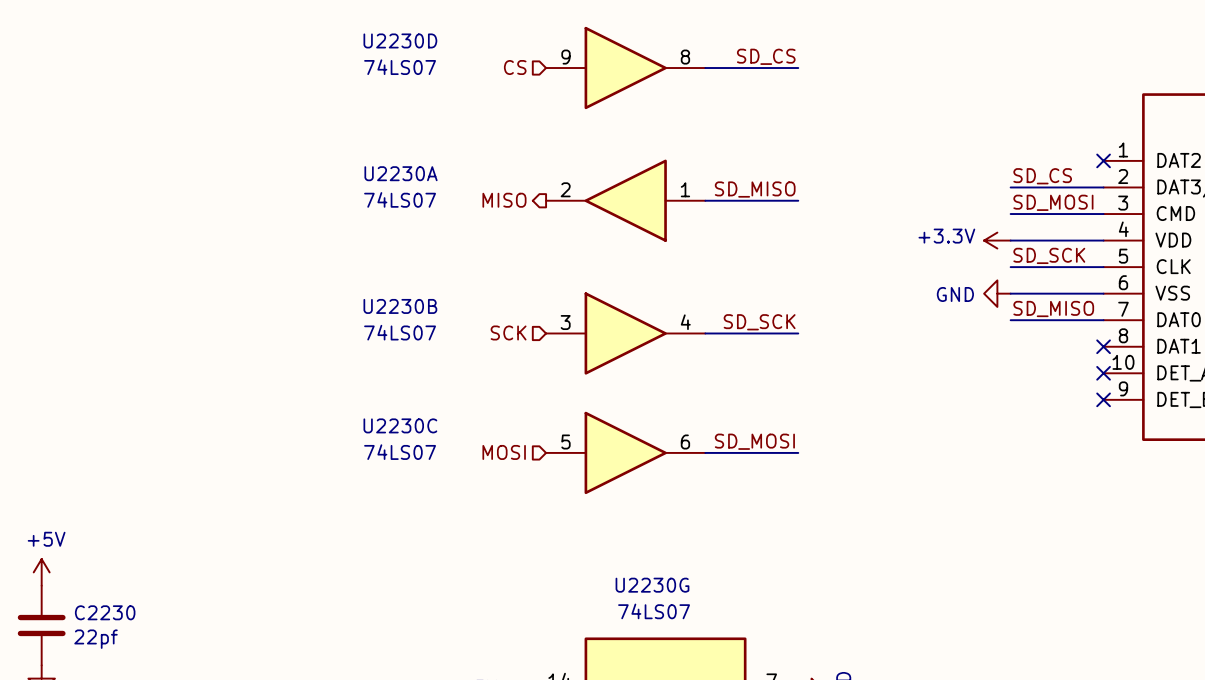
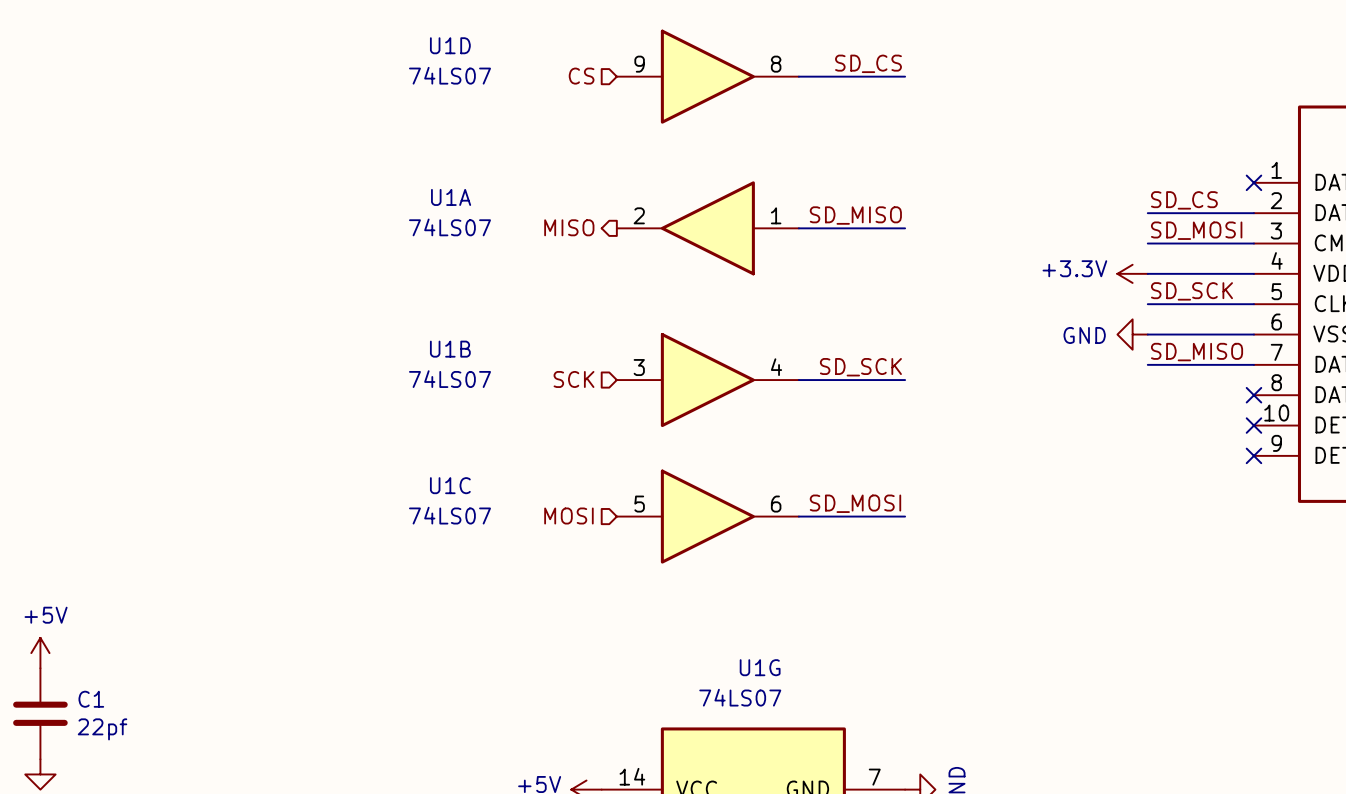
U2230D name: U2230D (400, 40) -> U1D (450, 45)
U2230A name: U2230A (401, 173) -> U1A (451, 197)
U2230B name: U2230B (400, 306) -> U1B (450, 349)
U2230C name: U2230C (400, 425) -> U1C (450, 485)
U2230G name: U2230G (652, 585) -> U1G (760, 667)
C2230 name: C2230 (105, 612) -> C1 (91, 699)

